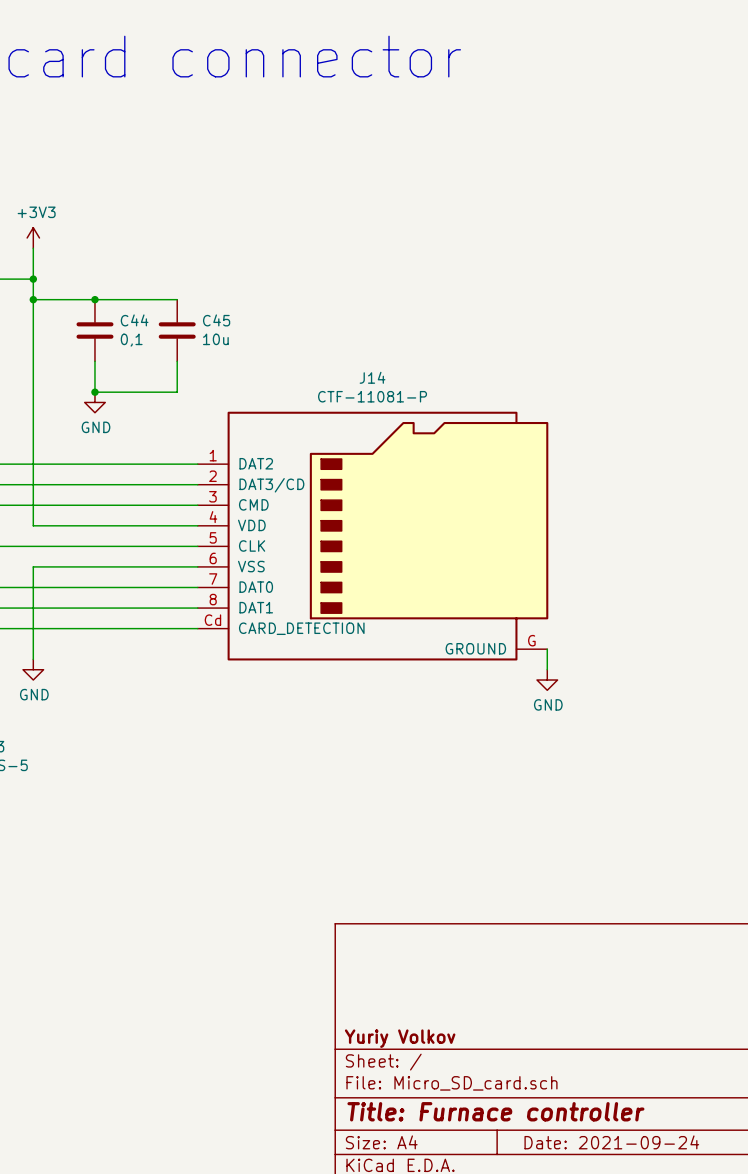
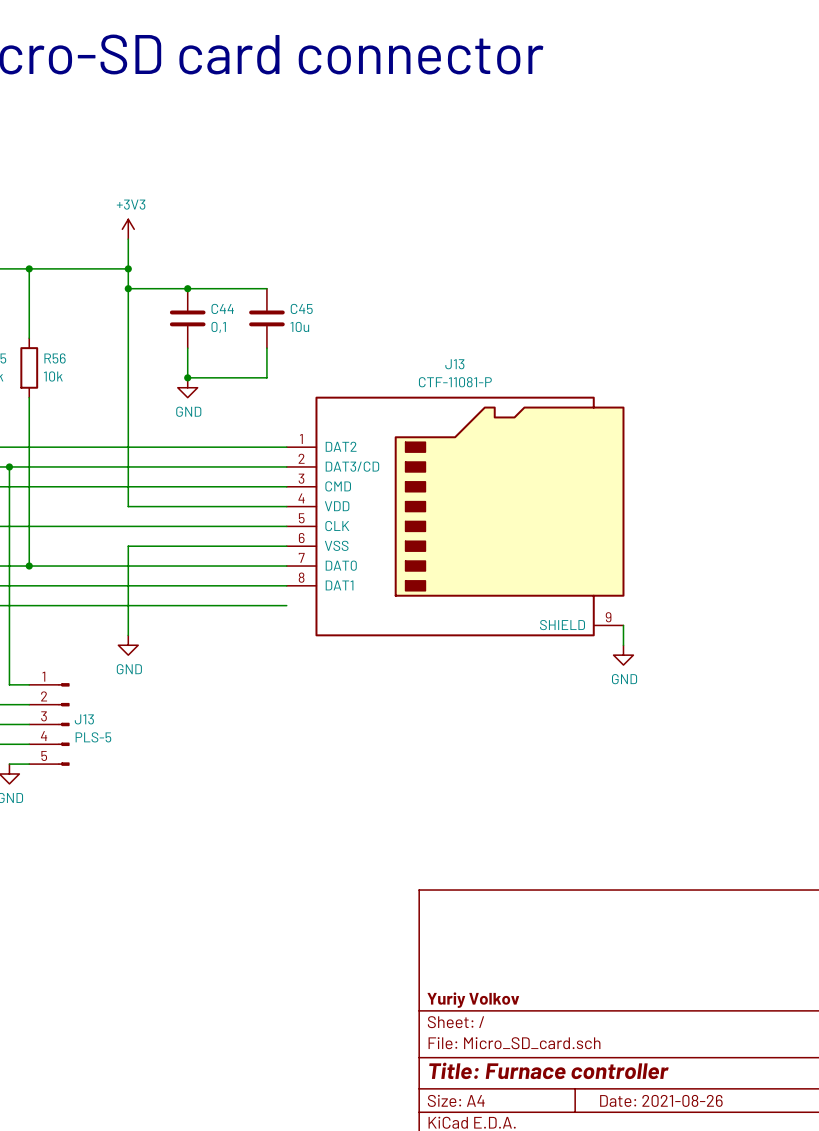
J14: CTF-11081-P (373, 536) -> none
J13: none -> CTF-11081-P (455, 516)
title block: Date: 2021-09-24 (611, 1142) -> Date: 2021-08-26 (661, 1100)

